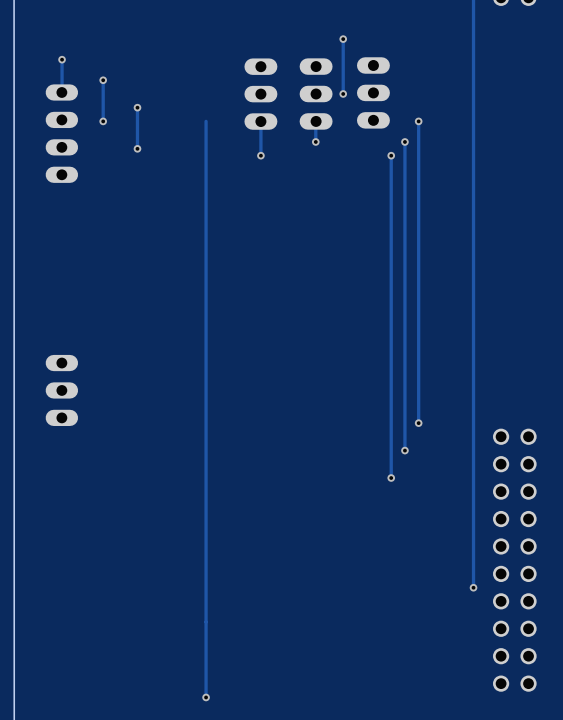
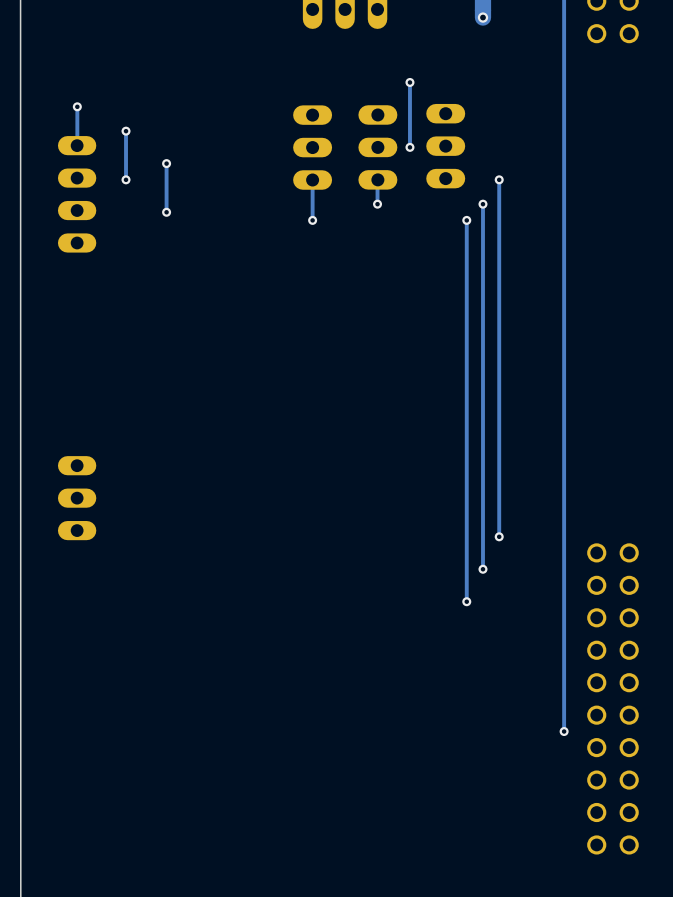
track: (206, 121) (206, 697) -> none
via: (206, 697) -> none

